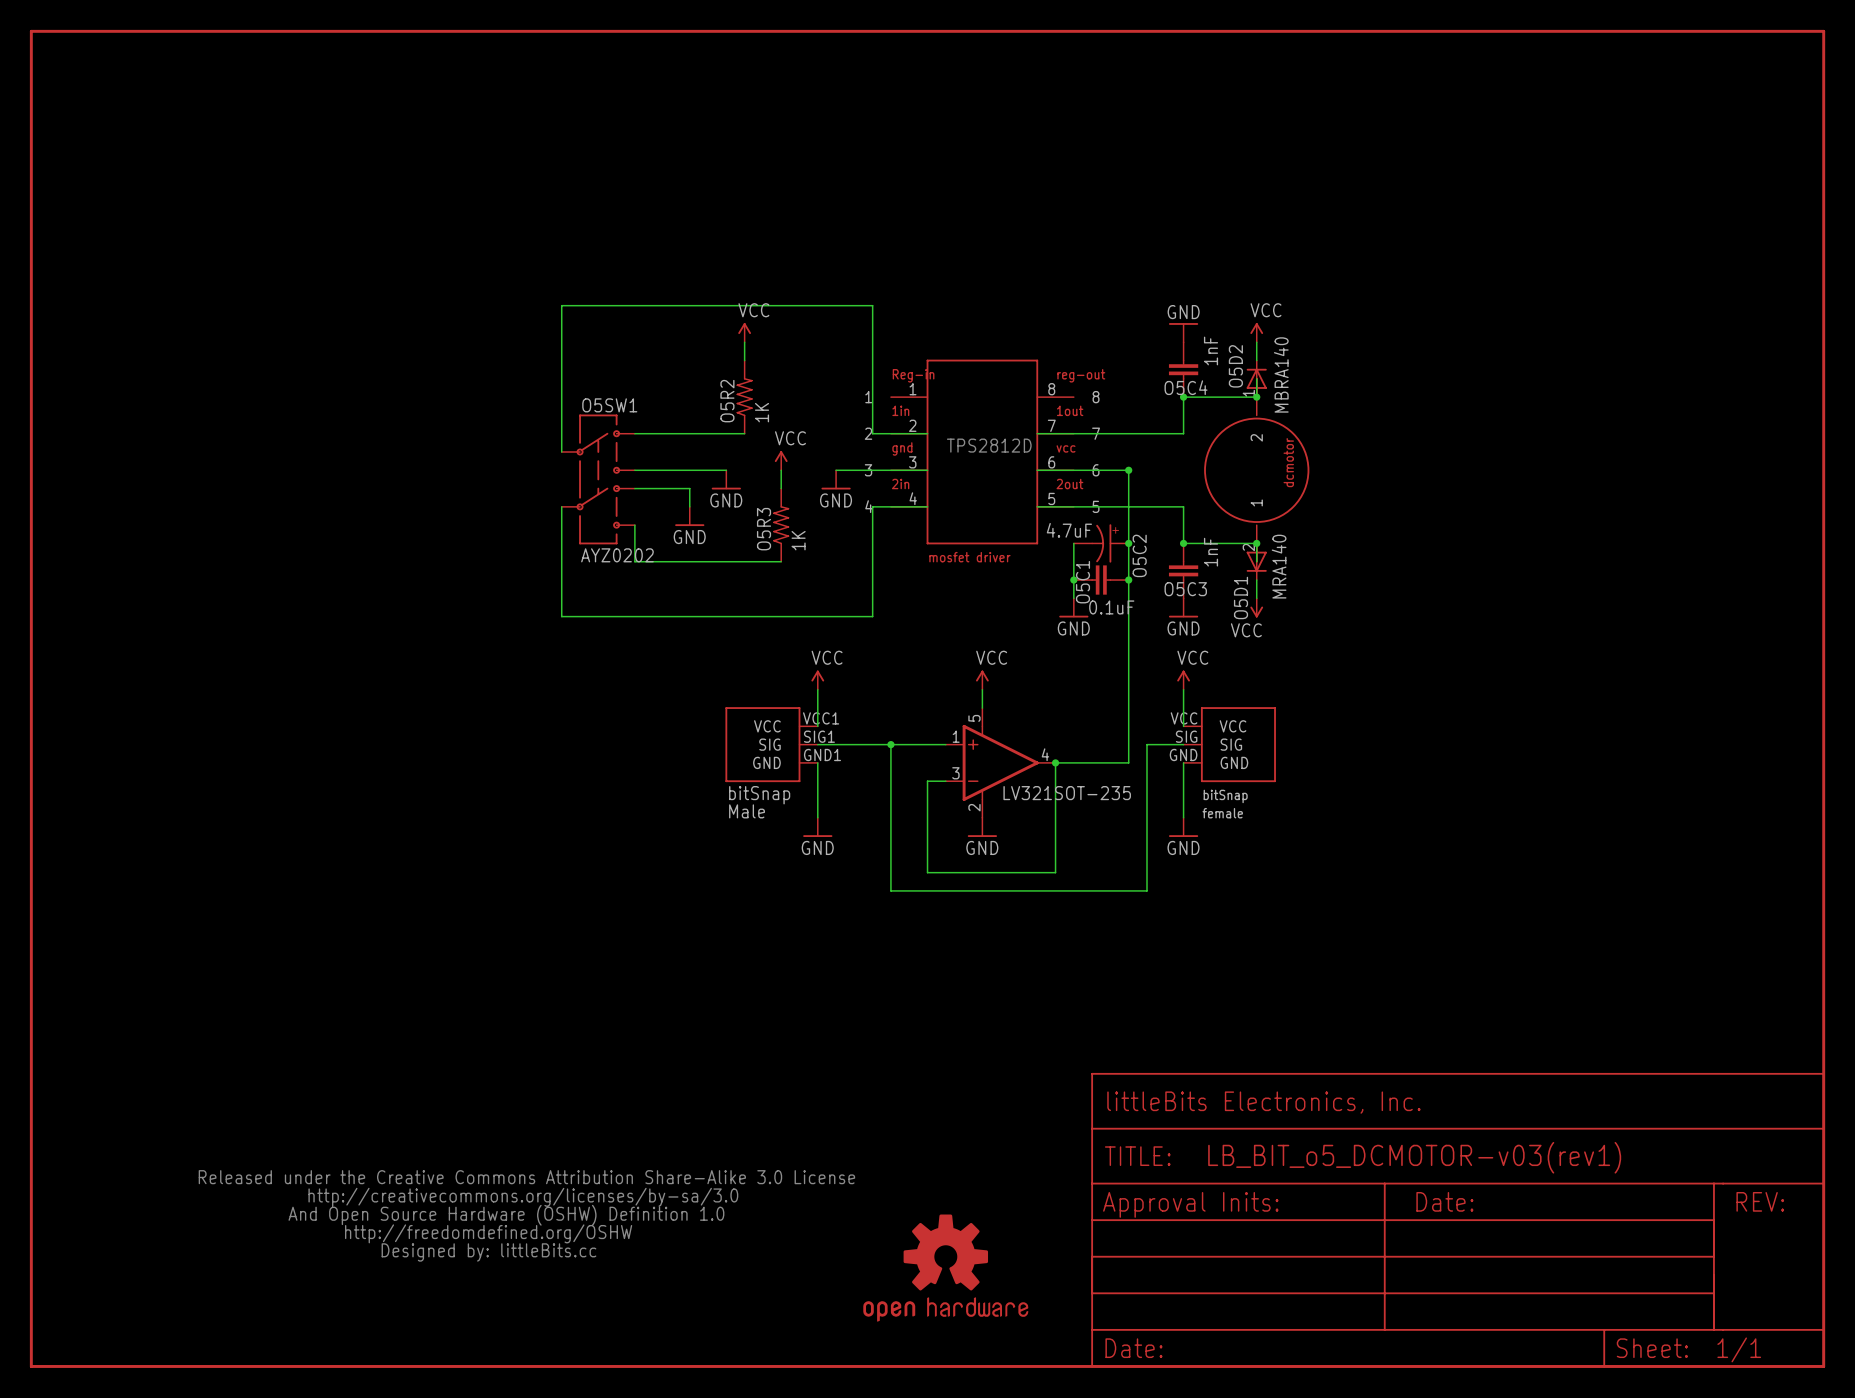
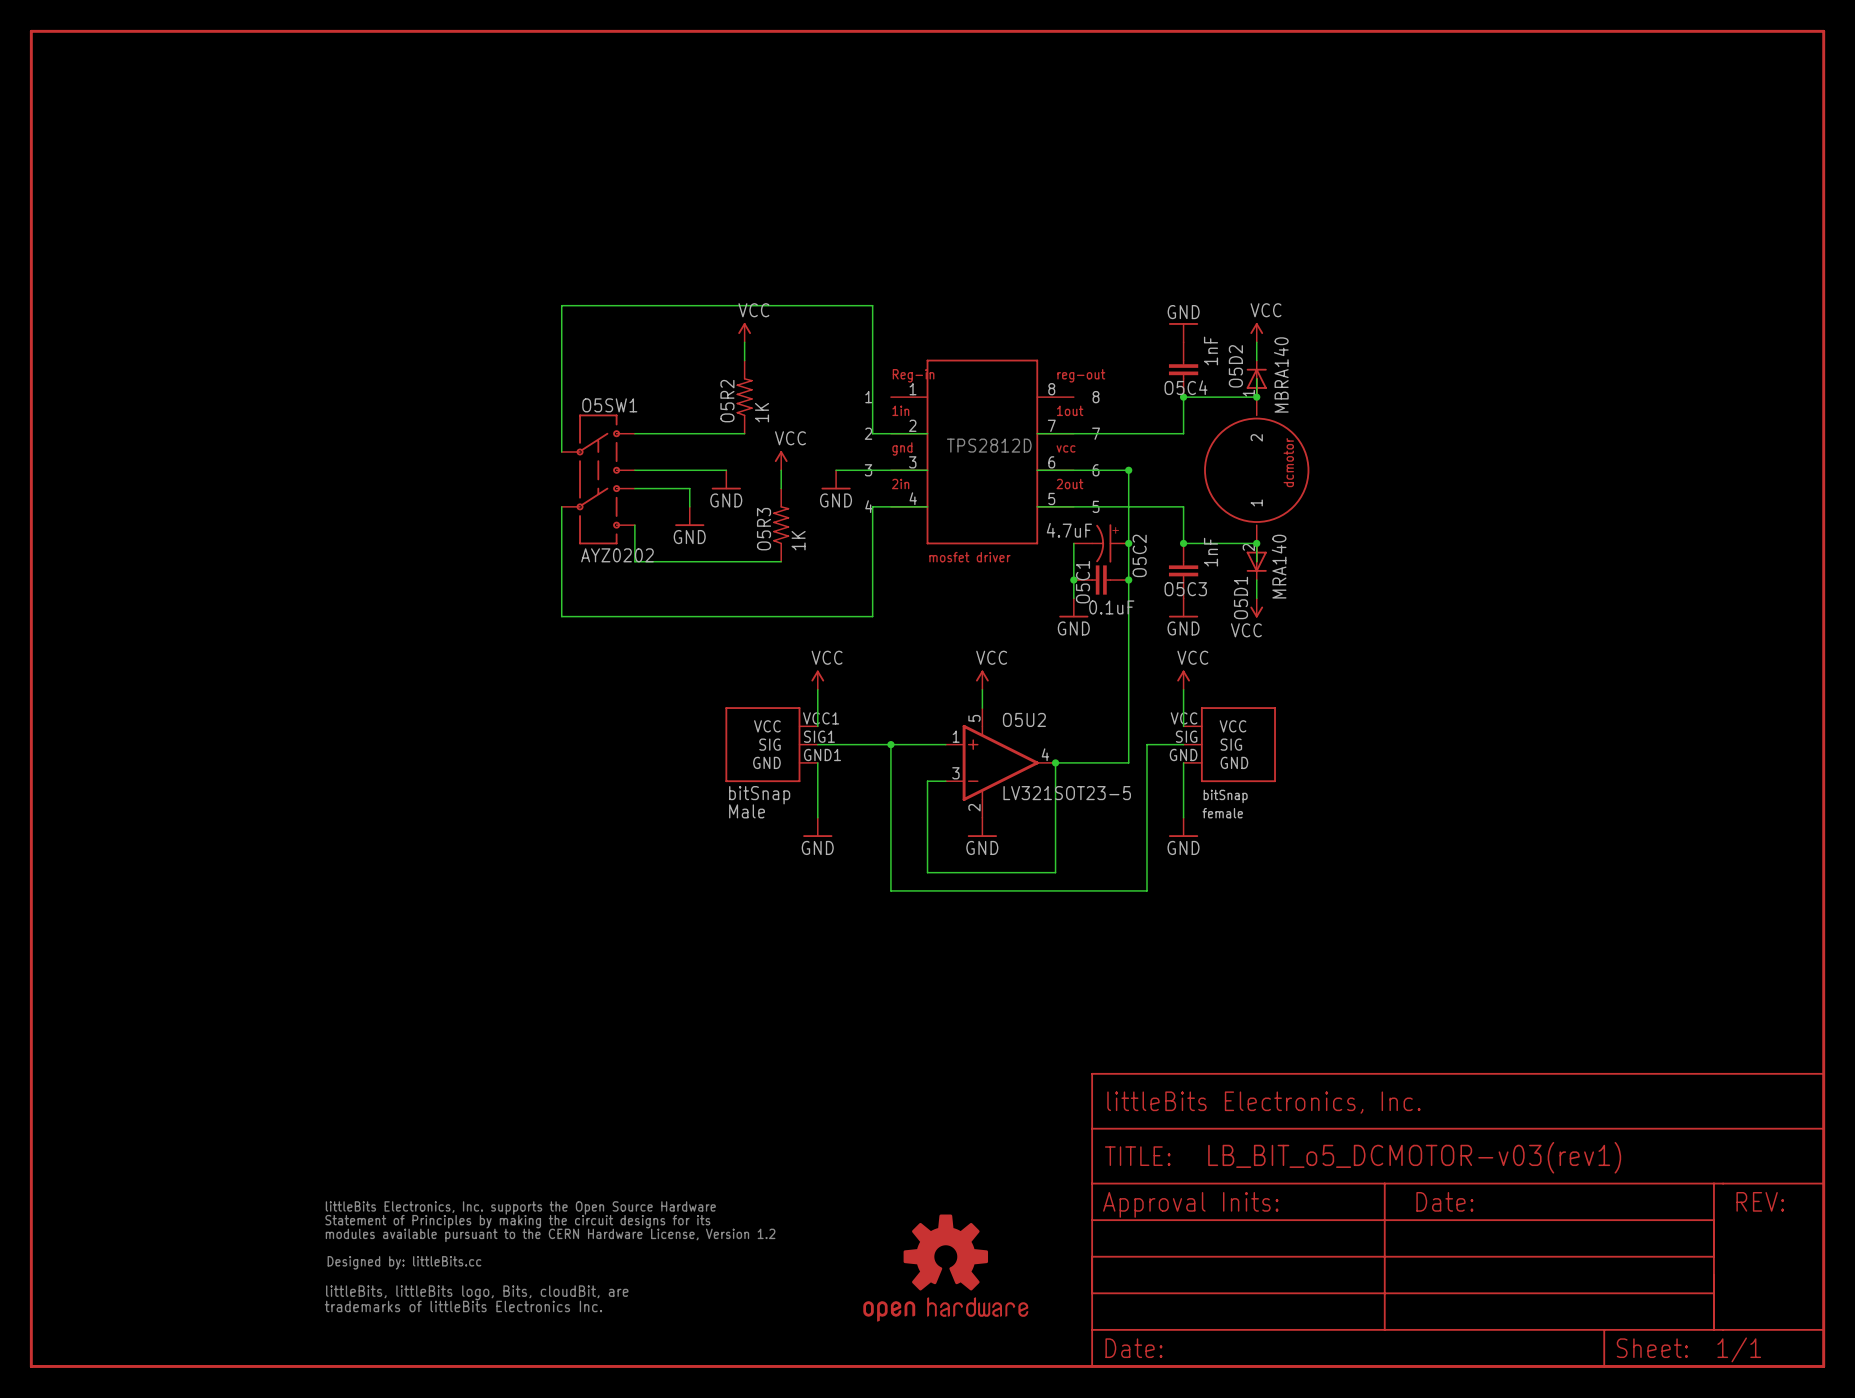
O5U2 name: none -> O5U2 (1024, 719)
O5U2 value: LV321SOT-235 (1067, 793) -> LV321SOT23-5 (1067, 793)
part: (526, 1215) -> none
part: none -> (550, 1256)

